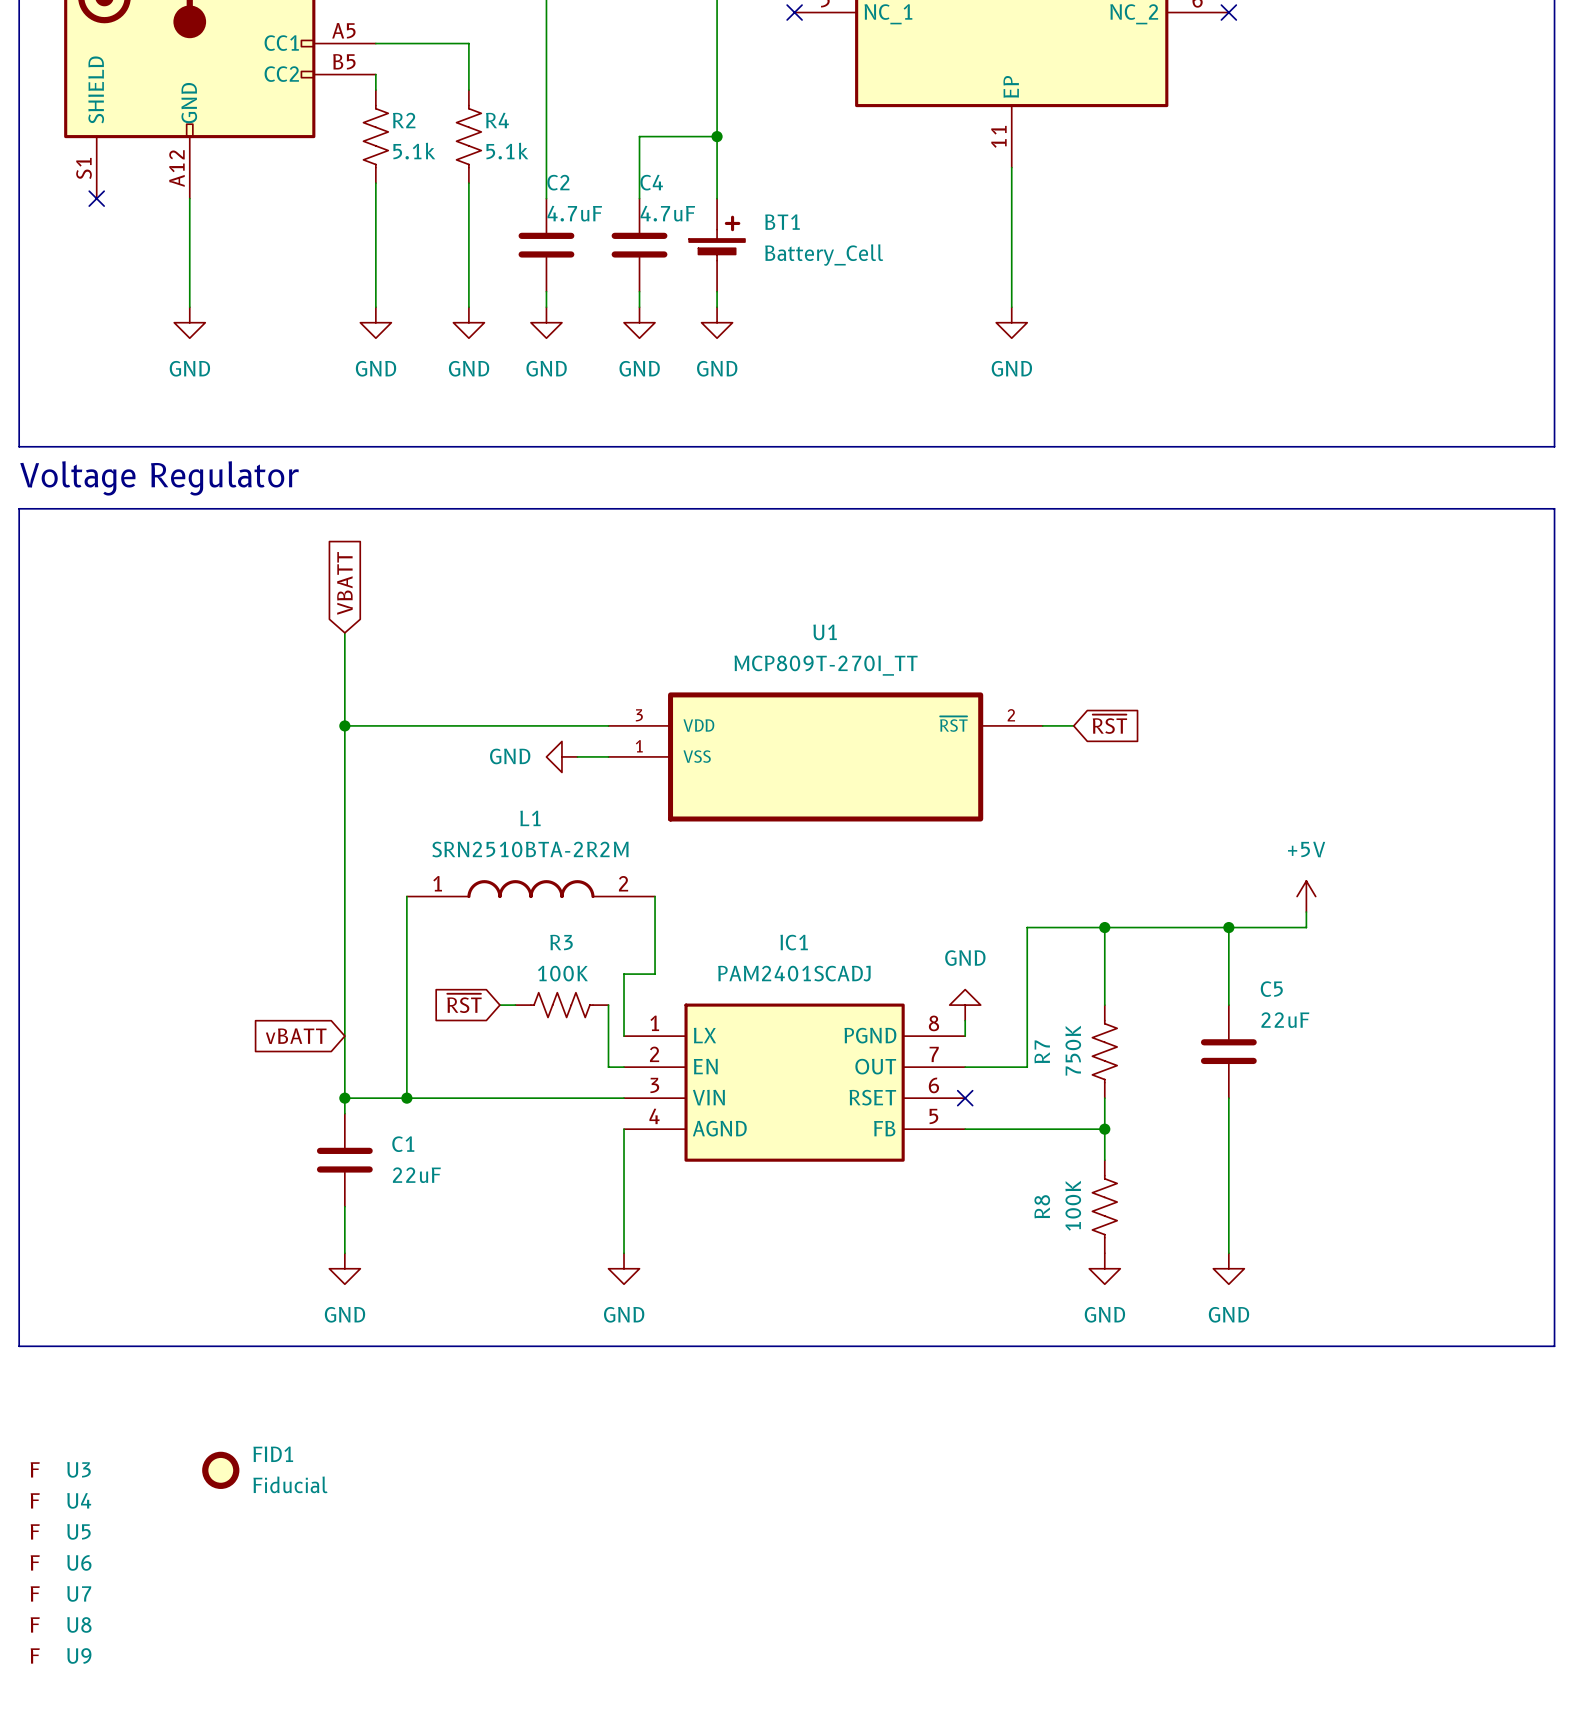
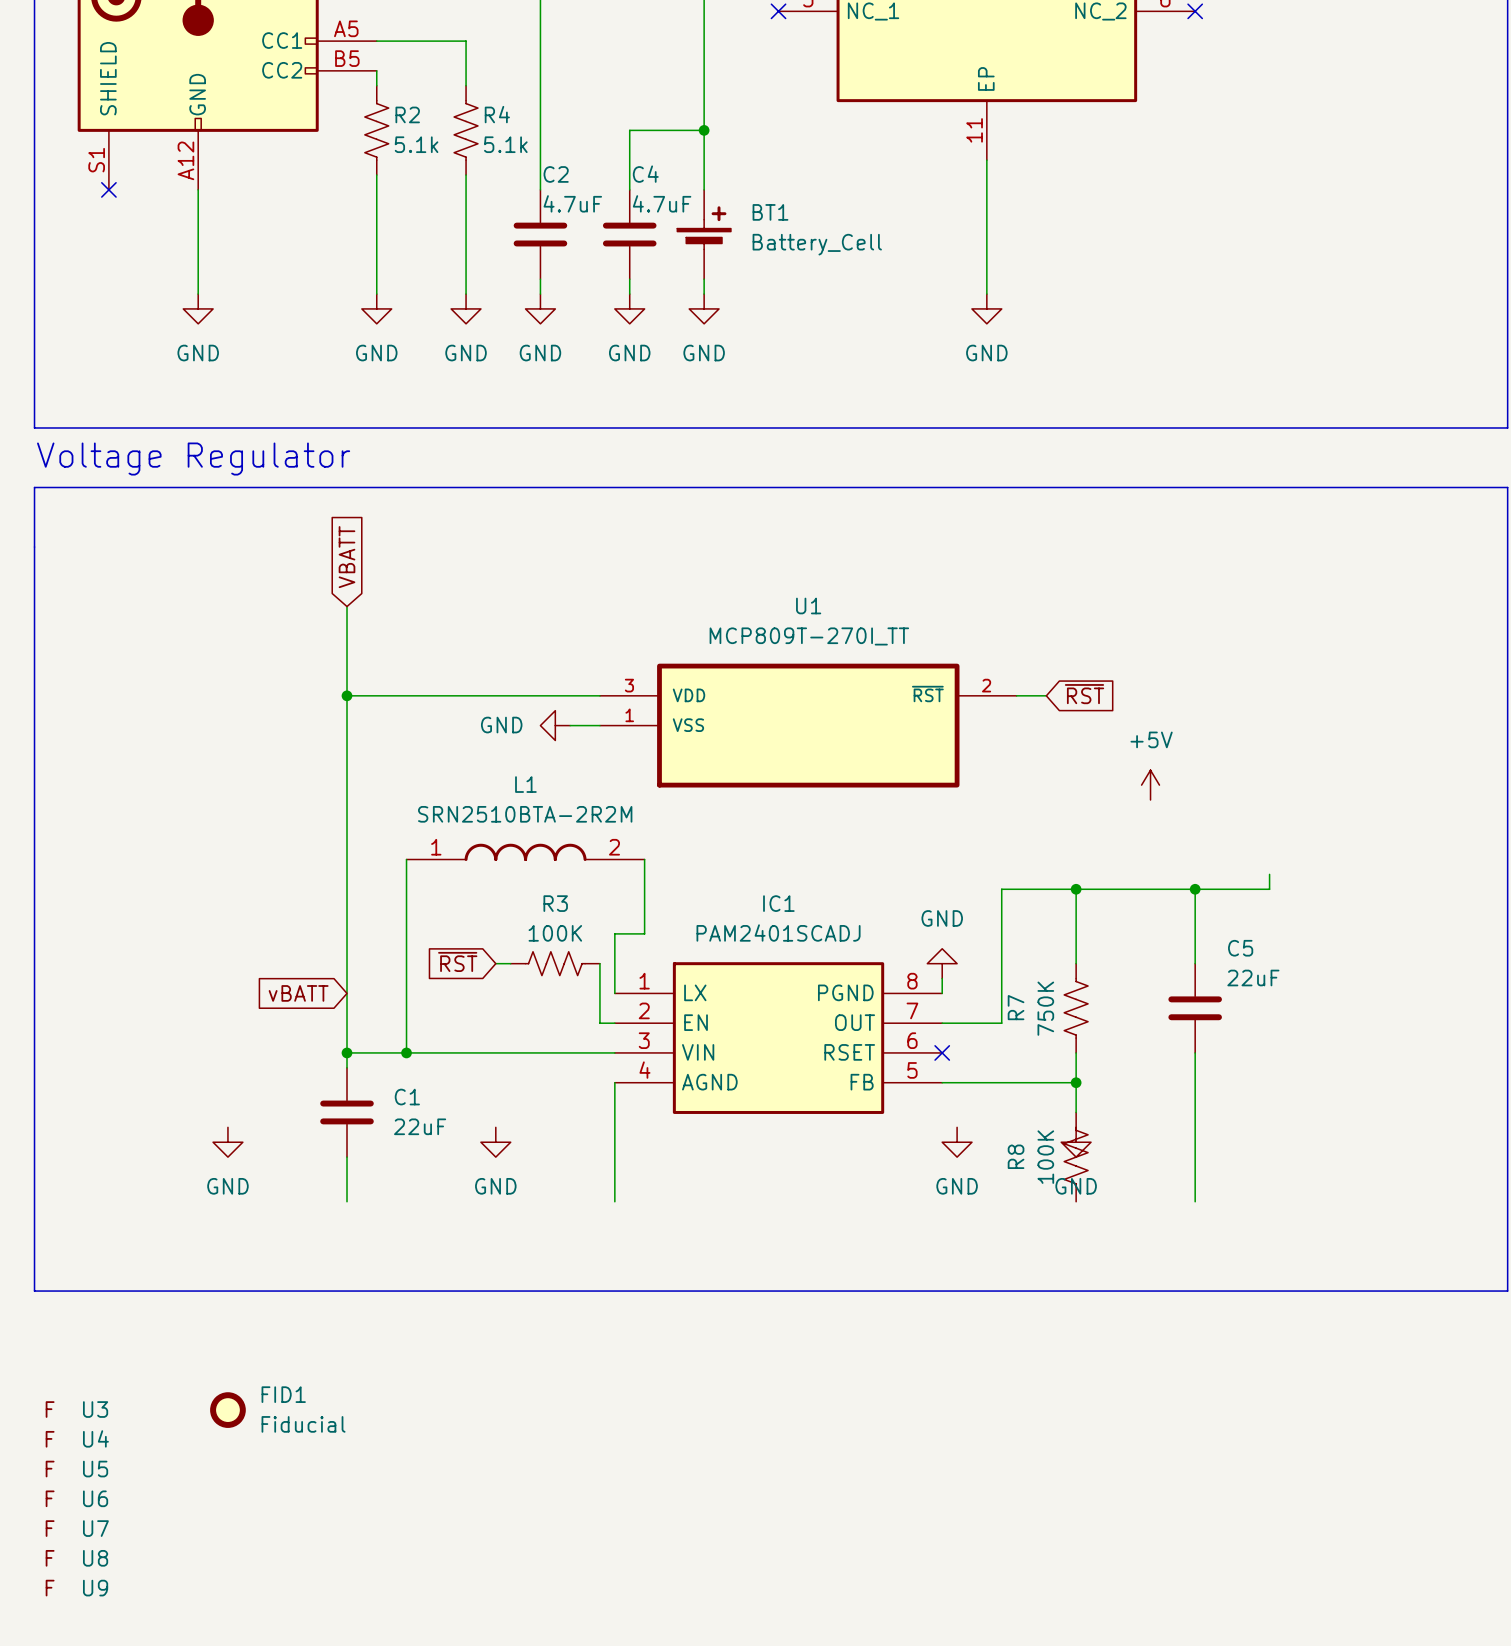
power symbol position: +5V (1306, 896) -> +5V (1150, 785)
power symbol: none -> GND (227, 1142)
power symbol: none -> GND (495, 1142)
power symbol: none -> GND (957, 1142)
power symbol: none -> GND (1076, 1142)
power symbol: GND (344, 1268) -> none
power symbol: GND (624, 1268) -> none
power symbol: GND (1104, 1268) -> none
power symbol: GND (1228, 1268) -> none

